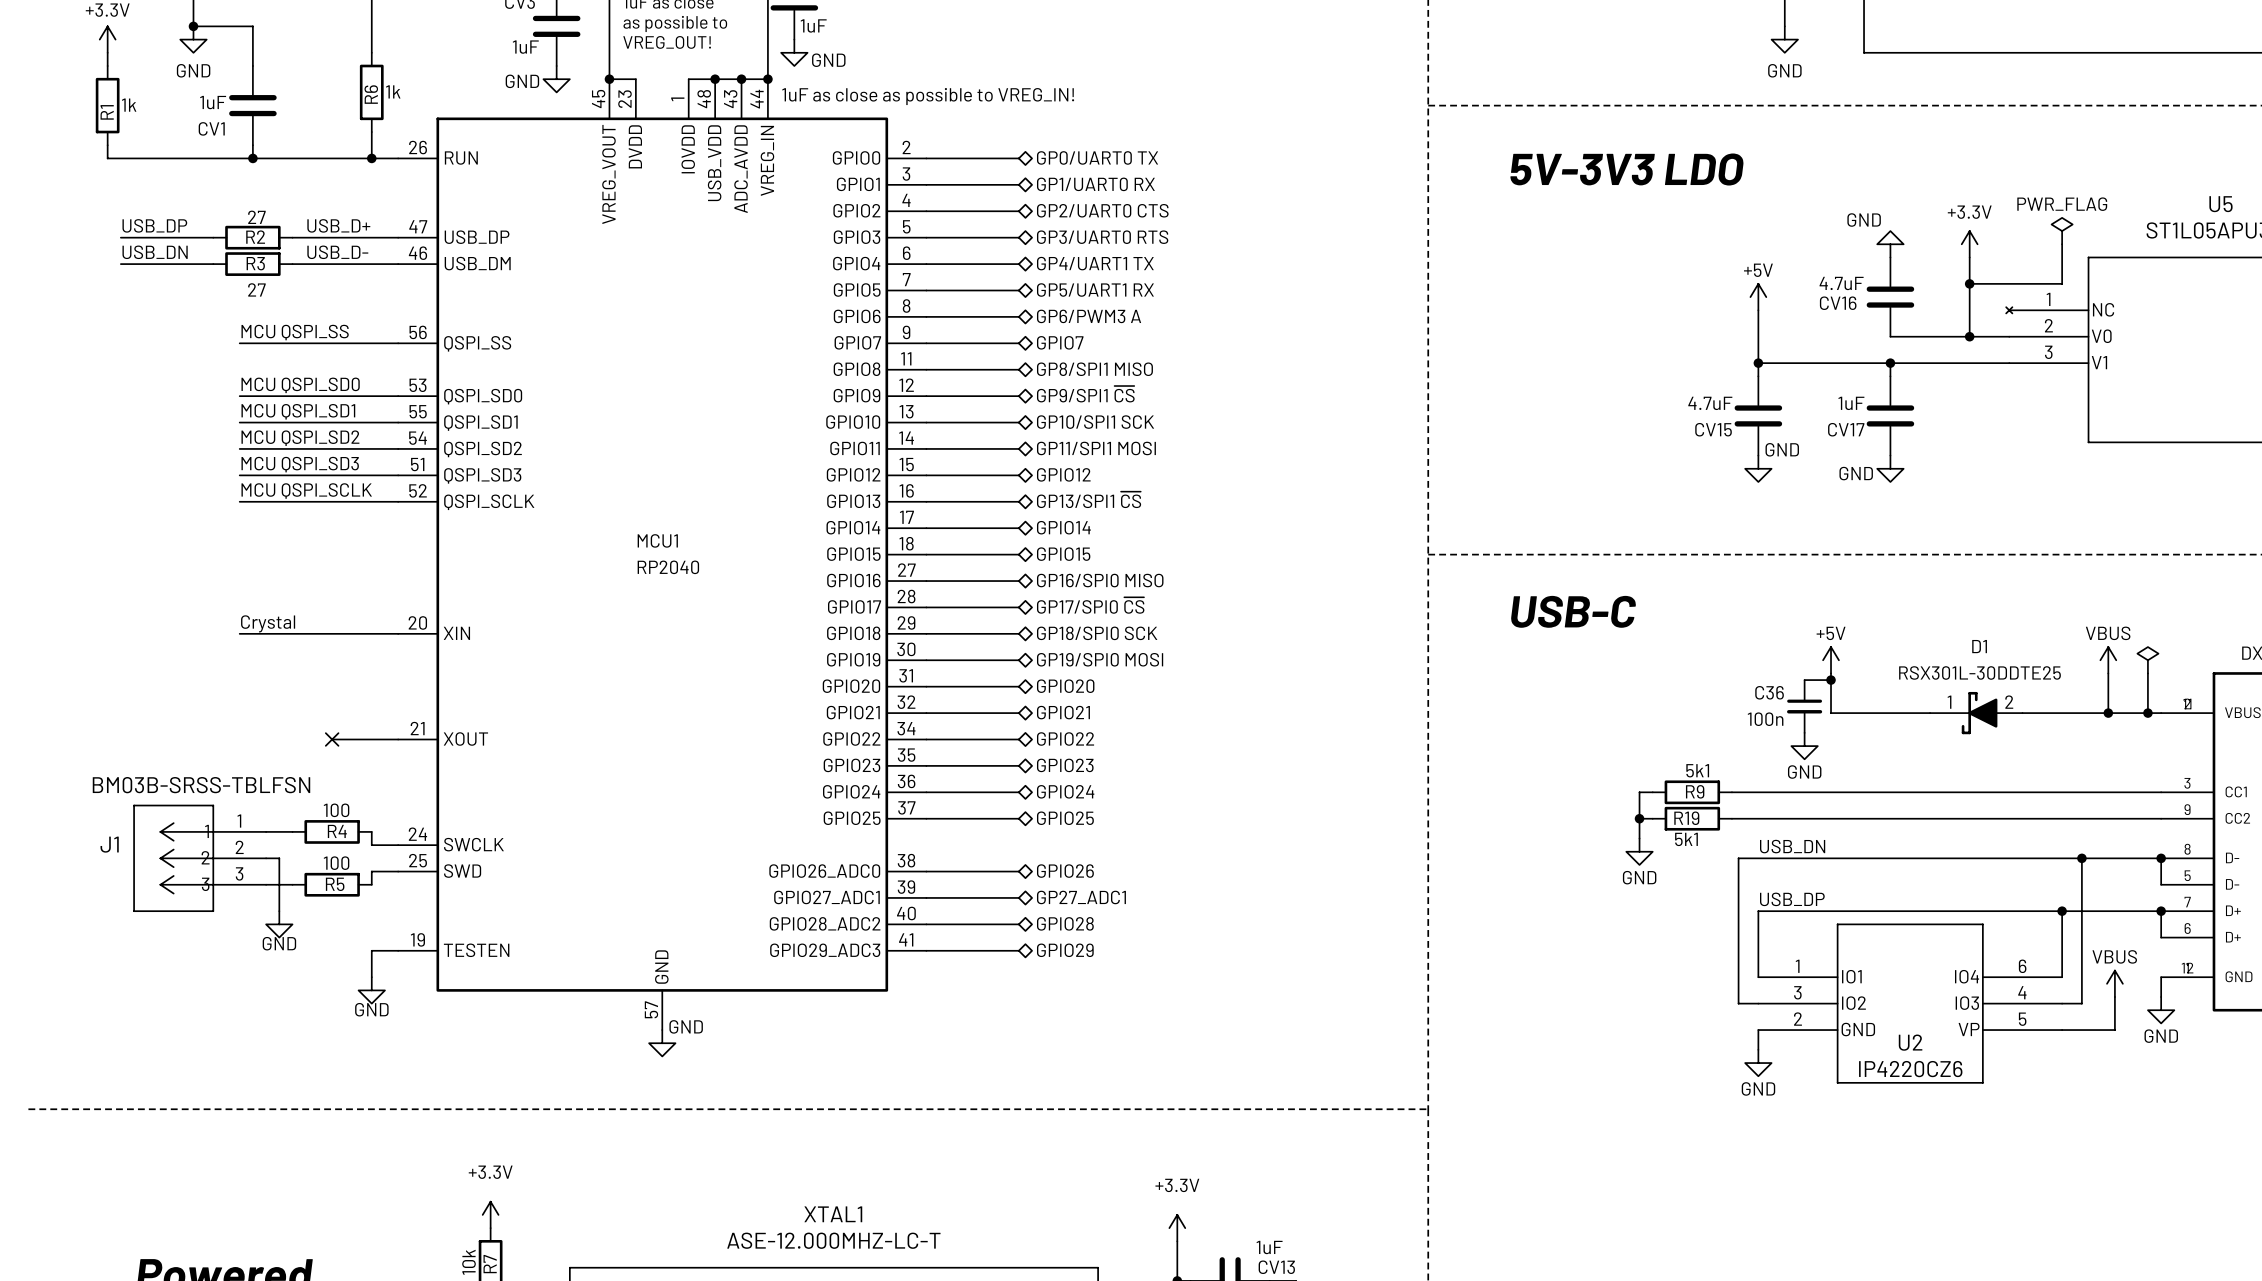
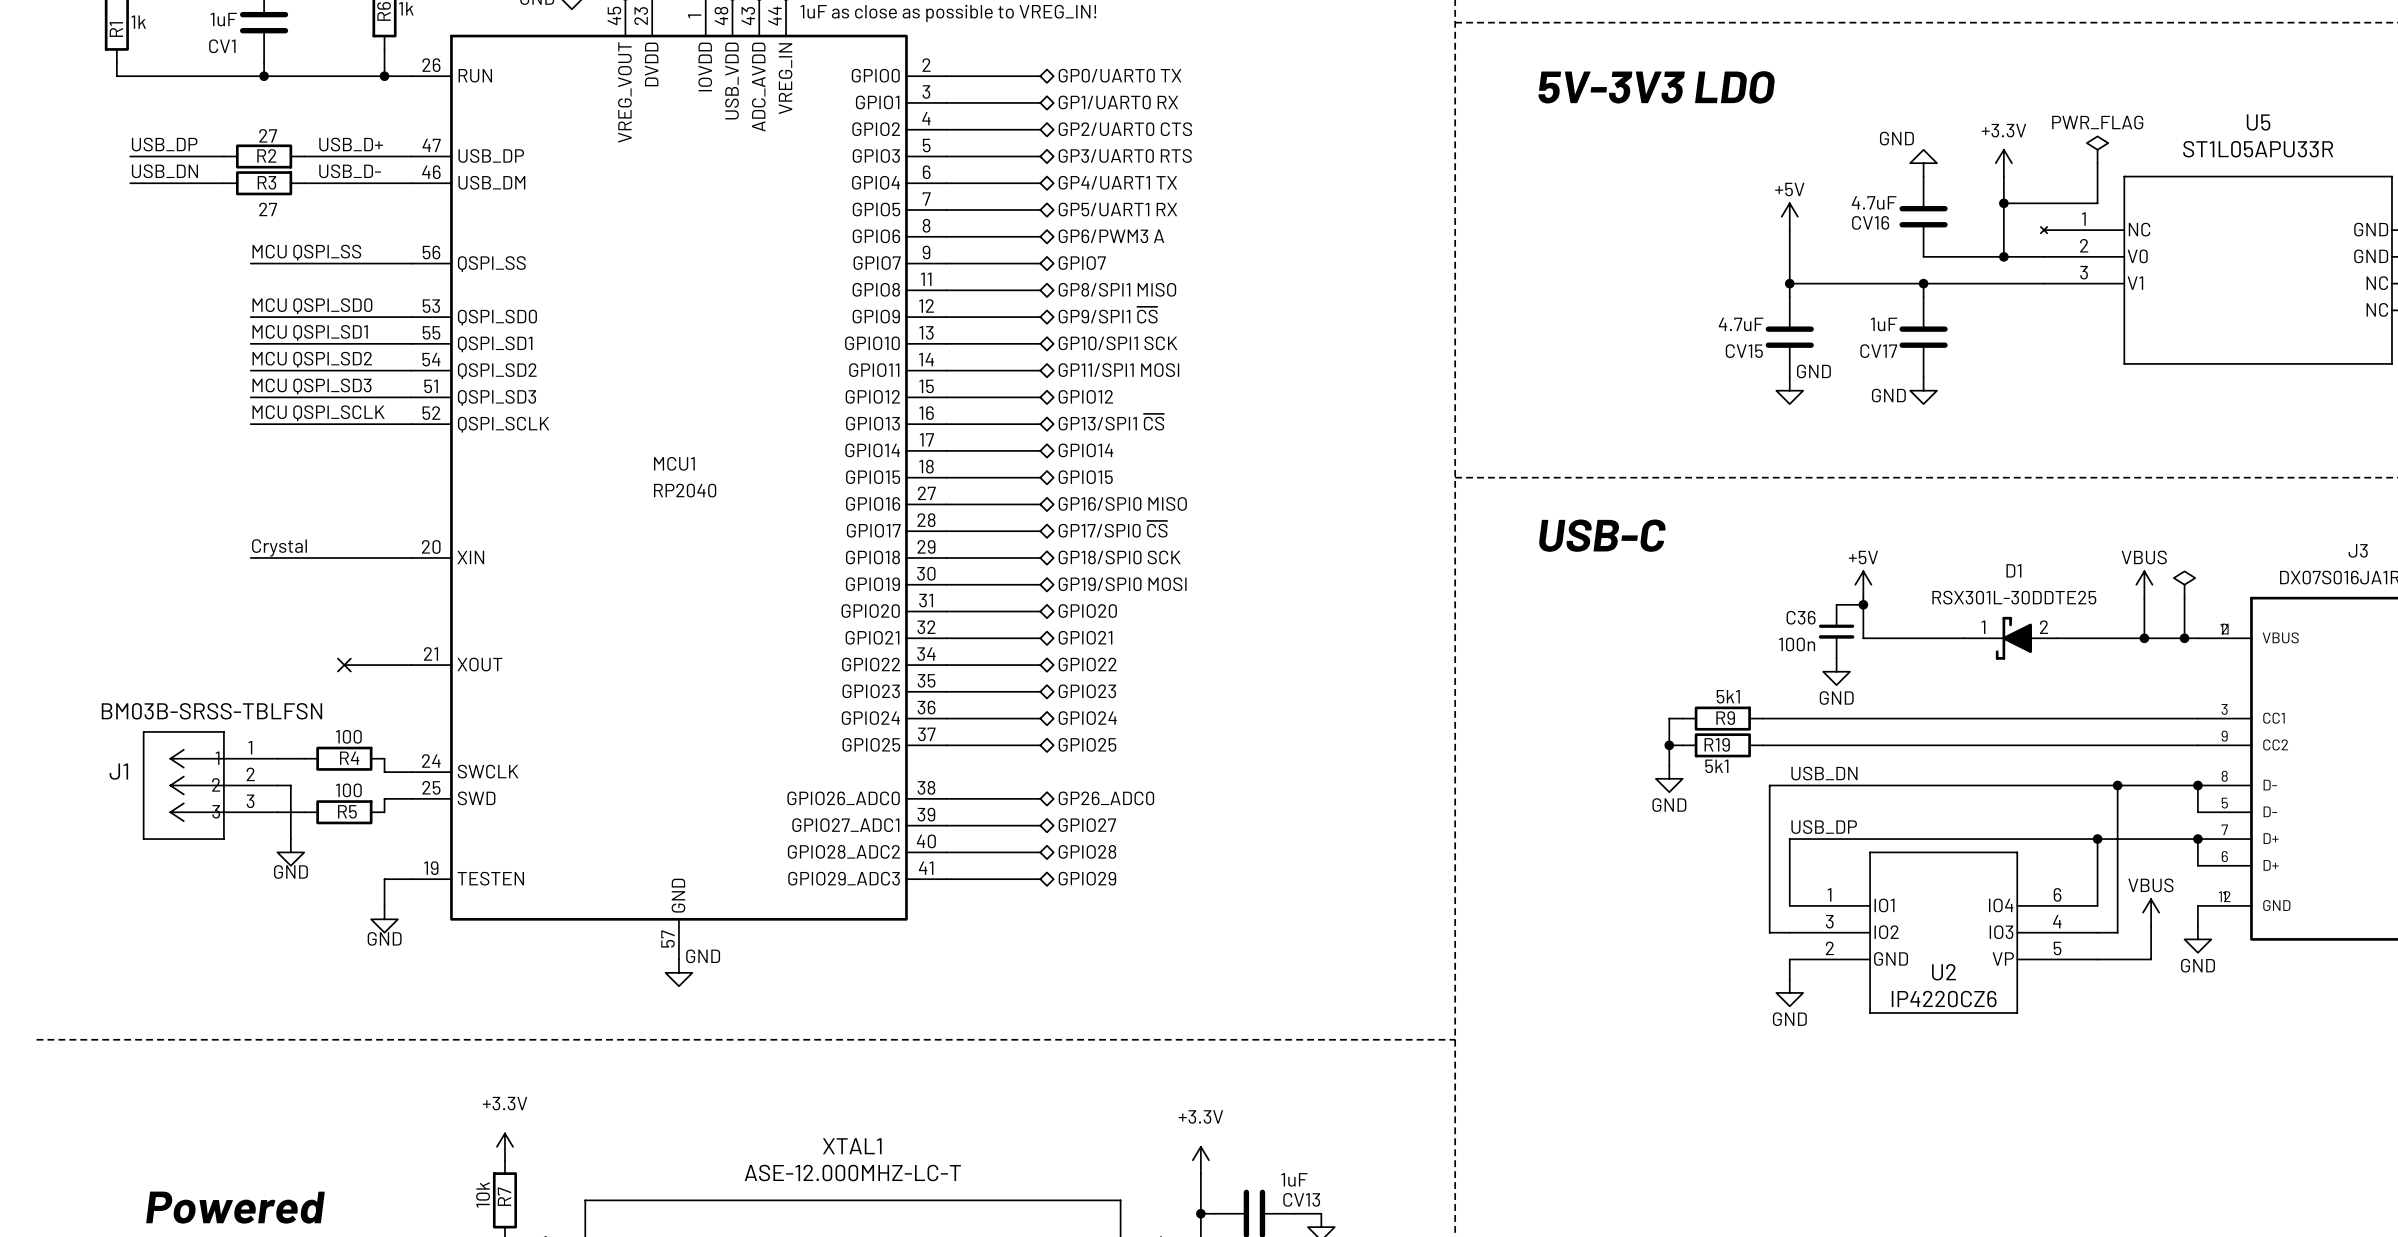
hierarchical label: GPIO26 (1065, 871) -> GP26_ADC0 (1106, 798)
hierarchical label: GP27_ADC1 (1081, 897) -> GPIO27 (1087, 825)

